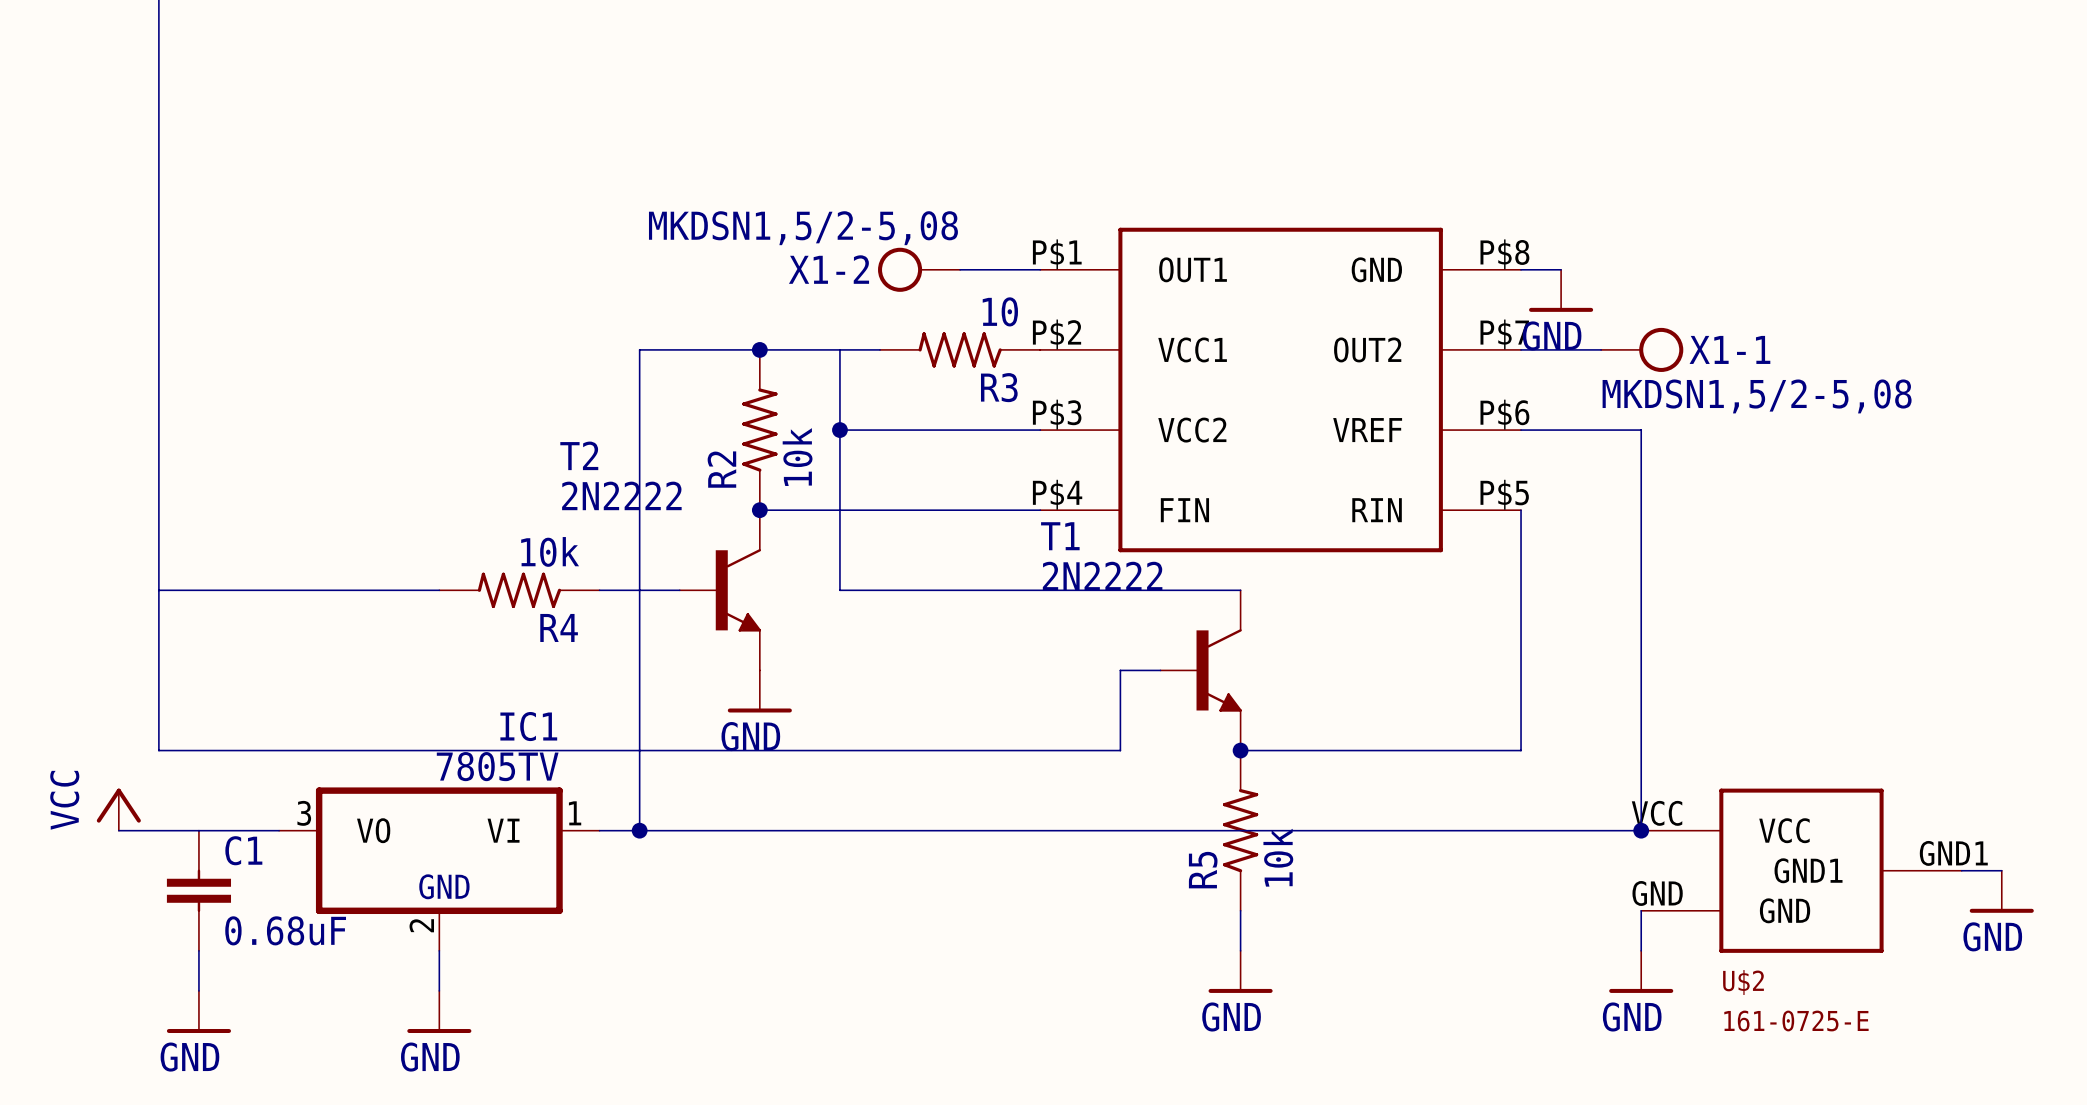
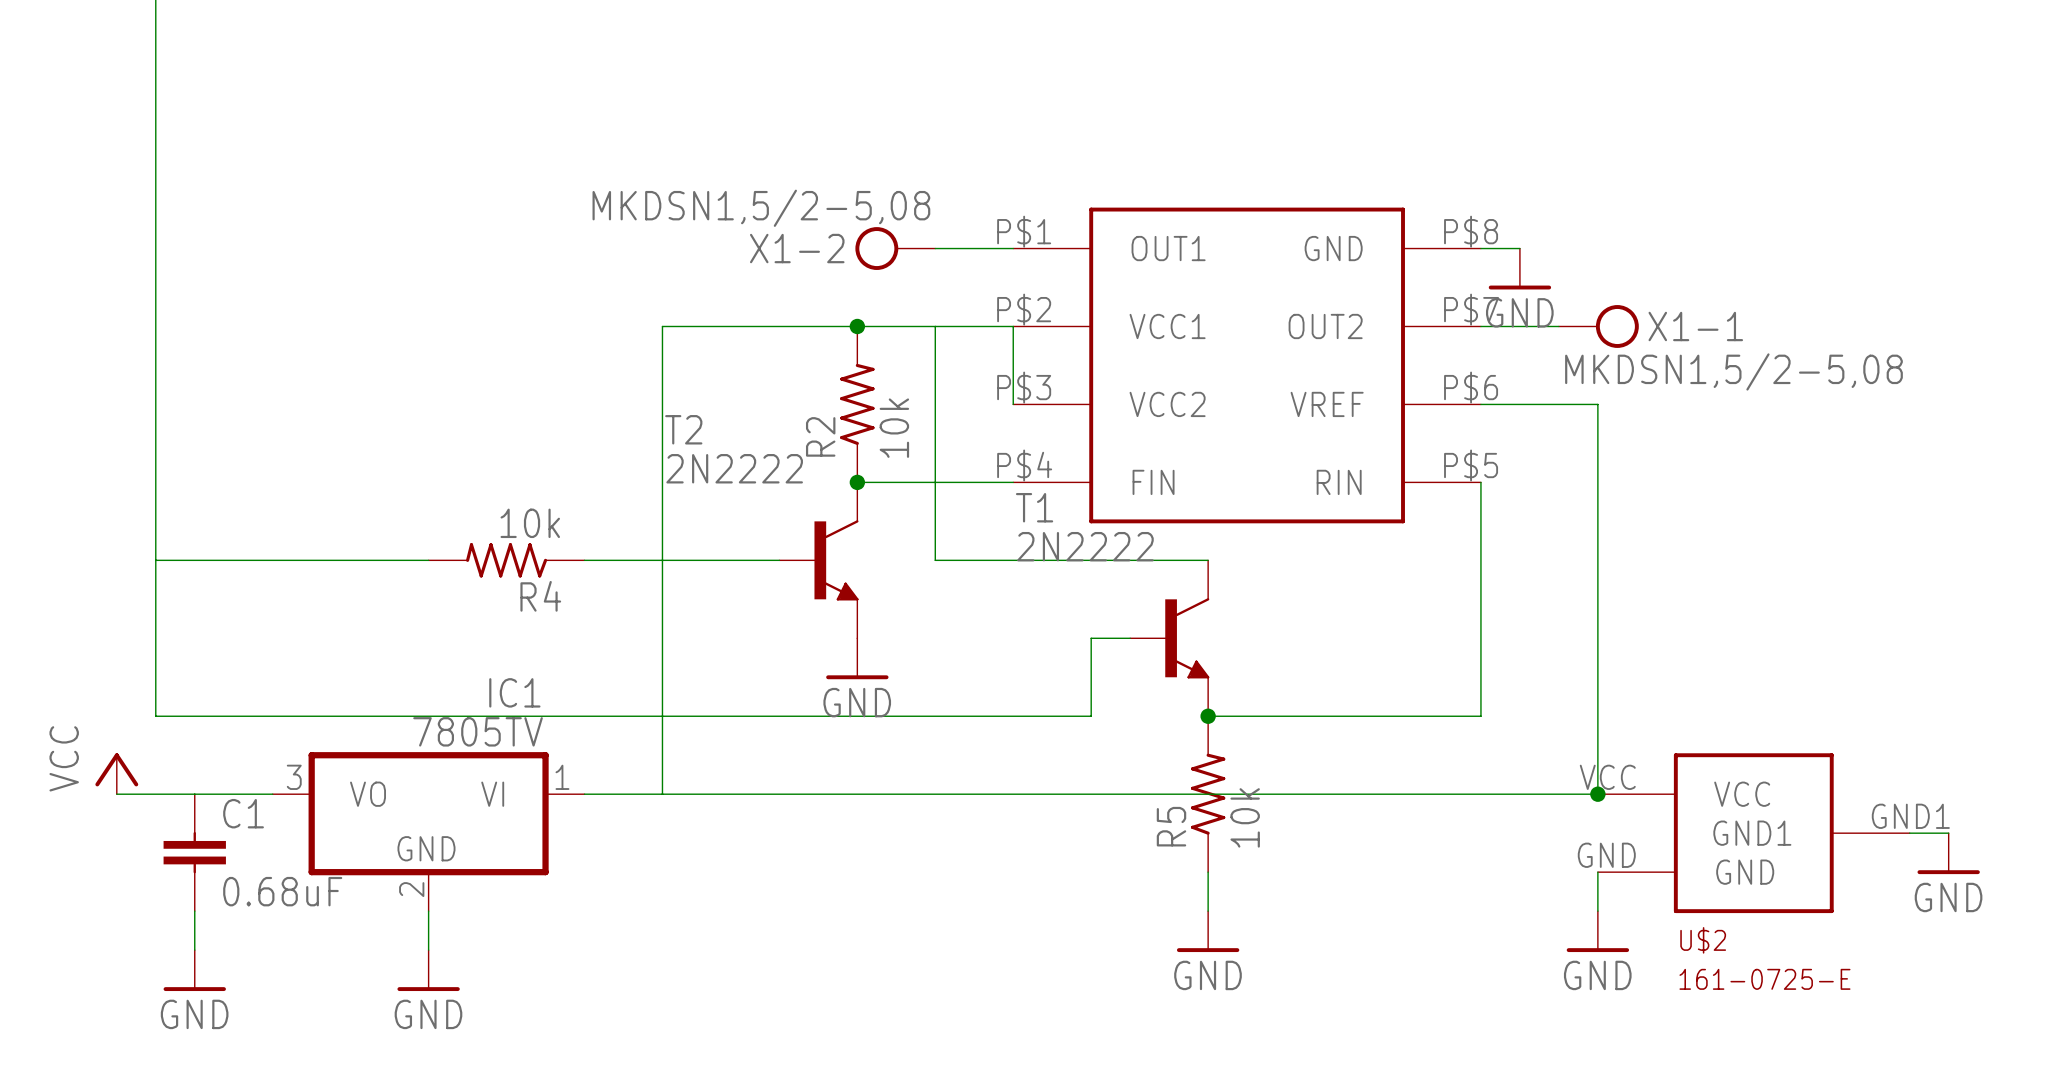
wire: (679, 349) (639, 349) (639, 830) -> (662, 326) (662, 794)
junction: (759, 349) -> none
wire: (839, 349) (839, 590) (960, 590) -> (935, 326) (935, 560)
junction: none -> (857, 326)
R3: 10 (960, 349) -> none
R2 position: (759, 430) -> (857, 404)
wire: (839, 430) (1040, 430) -> (857, 326) (1013, 326) (1013, 404)
junction: (839, 430) -> none
wire: (759, 510) (880, 510) -> (662, 560) (779, 560)
junction: (759, 510) -> none
junction: none -> (857, 482)
T2 position: (720, 590) -> (818, 560)
power symbol position: GND (759, 691) -> GND (857, 658)
junction: (639, 830) -> none

